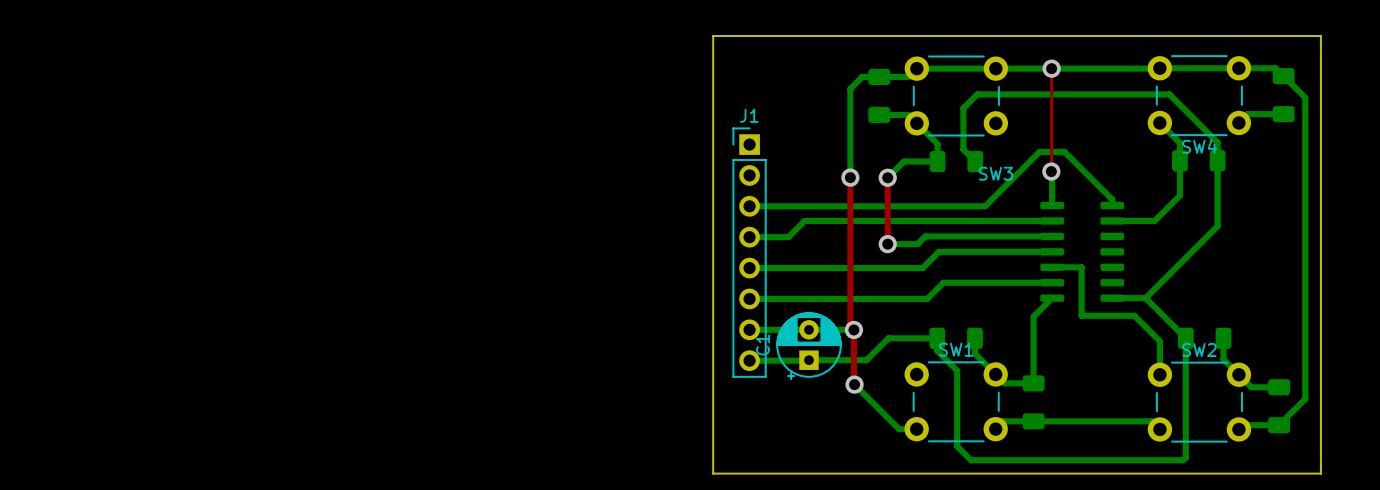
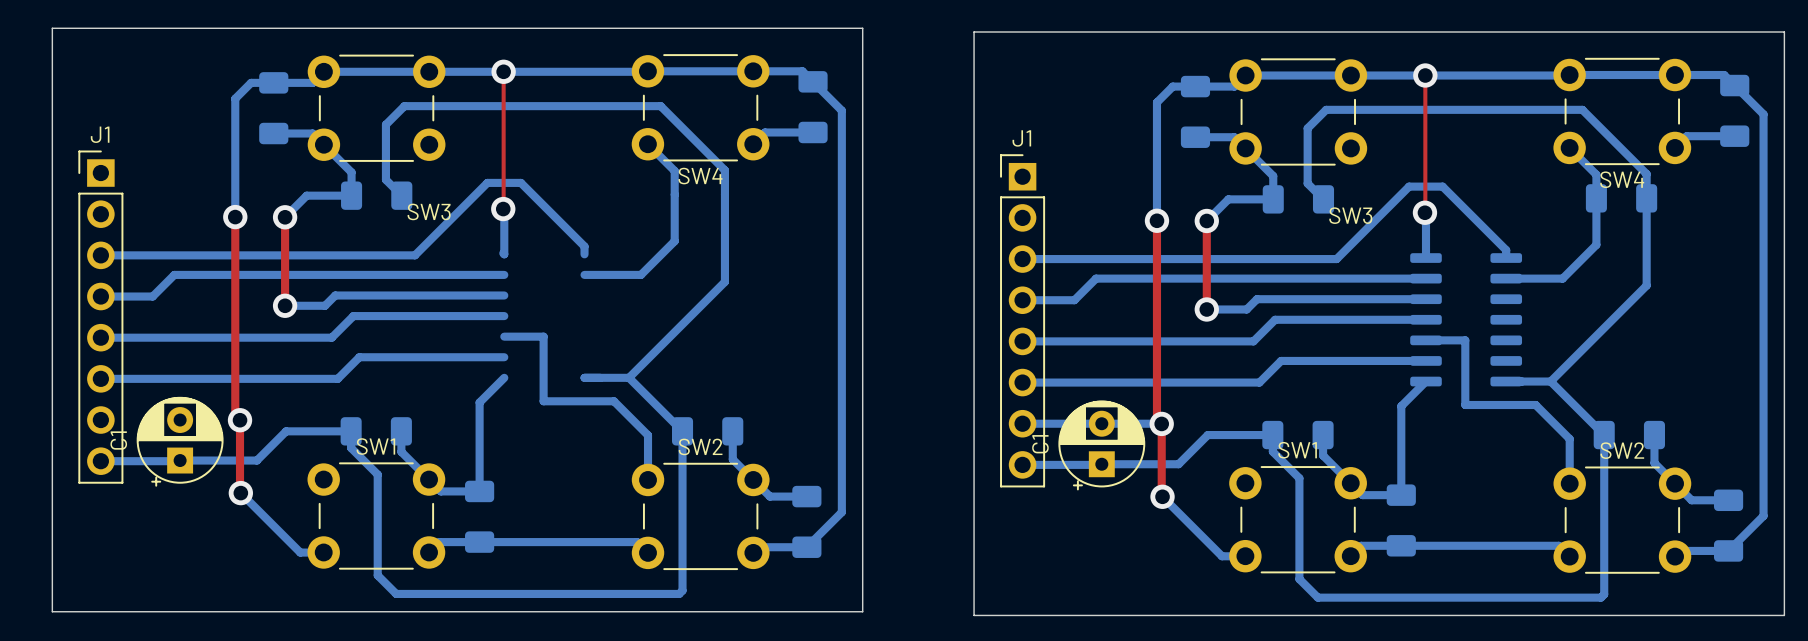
board edge: none -> (52, 28) (52, 611) (862, 611) (862, 28) (52, 28)
top track: none -> (503, 71) (503, 209)
via: none -> (503, 71)
SW4: none -> (700, 107)
part: none -> (813, 107)
part: none -> (273, 108)
SW3: none -> (376, 108)
bottom track: none -> (813, 132) (765, 132) (753, 144)
bottom track: none -> (273, 133) (312, 133) (351, 172) (351, 195) (306, 195) (285, 217)
bottom track: none -> (647, 144) (674, 171) (674, 241) (640, 274) (584, 274)
part: none -> (376, 195)
bottom track: none -> (401, 195) (385, 179) (385, 124) (404, 106) (660, 106) (724, 170) (724, 281) (629, 377)
bottom track: none -> (503, 209) (503, 253)
via: none -> (503, 209)
bottom track: none -> (235, 217) (235, 98) (251, 82) (312, 82) (323, 71) (802, 71) (841, 110) (841, 512) (806, 547) (759, 547) (753, 552)
top track: none -> (235, 217) (235, 415) (240, 420) (240, 493)
via: none -> (235, 217)
top track: none -> (285, 217) (285, 297)
via: none -> (285, 217)
bottom track: none -> (584, 254) (584, 246) (520, 182) (487, 182) (414, 255) (100, 255)
bottom track: none -> (504, 274) (174, 274) (152, 296) (100, 296)
bottom track: none -> (504, 295) (335, 295) (325, 305) (285, 305)
via: none -> (285, 305)
J1: none -> (100, 317)
bottom track: none -> (504, 316) (353, 316) (331, 337) (100, 337)
bottom track: none -> (504, 336) (543, 336) (543, 401) (614, 401) (648, 435) (648, 479)
bottom track: none -> (504, 357) (359, 357) (337, 378) (100, 378)
bottom track: none -> (504, 377) (479, 402) (479, 491)
bottom track: none -> (584, 377) (629, 377)
bottom track: none -> (629, 377) (682, 431) (682, 590) (679, 593) (396, 593) (377, 575) (377, 474) (351, 447) (351, 431) (286, 431) (256, 460) (100, 461)
via: none -> (240, 420)
part: none -> (376, 431)
bottom track: none -> (401, 431) (401, 451) (440, 491) (482, 491)
part: none -> (707, 431)
bottom track: none -> (732, 431) (732, 459) (769, 496) (806, 496)
C1: none -> (180, 441)
bottom track: none -> (240, 493) (300, 552) (323, 552)
via: none -> (240, 493)
SW1: none -> (376, 516)
part: none -> (479, 516)
SW2: none -> (700, 516)
part: none -> (806, 521)
bottom track: none -> (429, 552) (439, 542) (637, 542) (648, 552)

